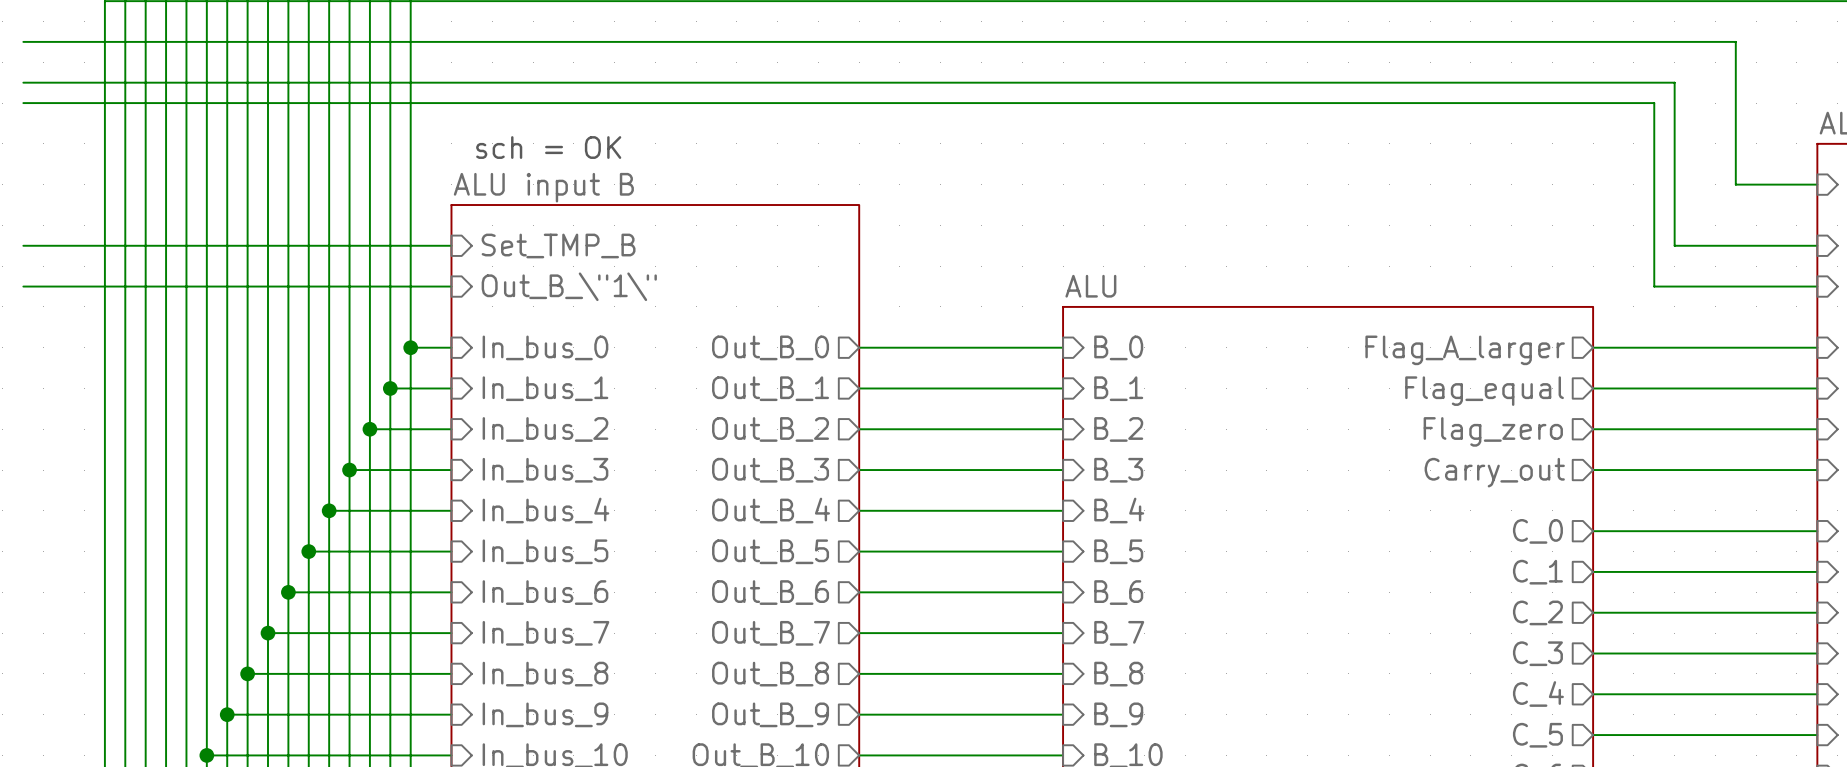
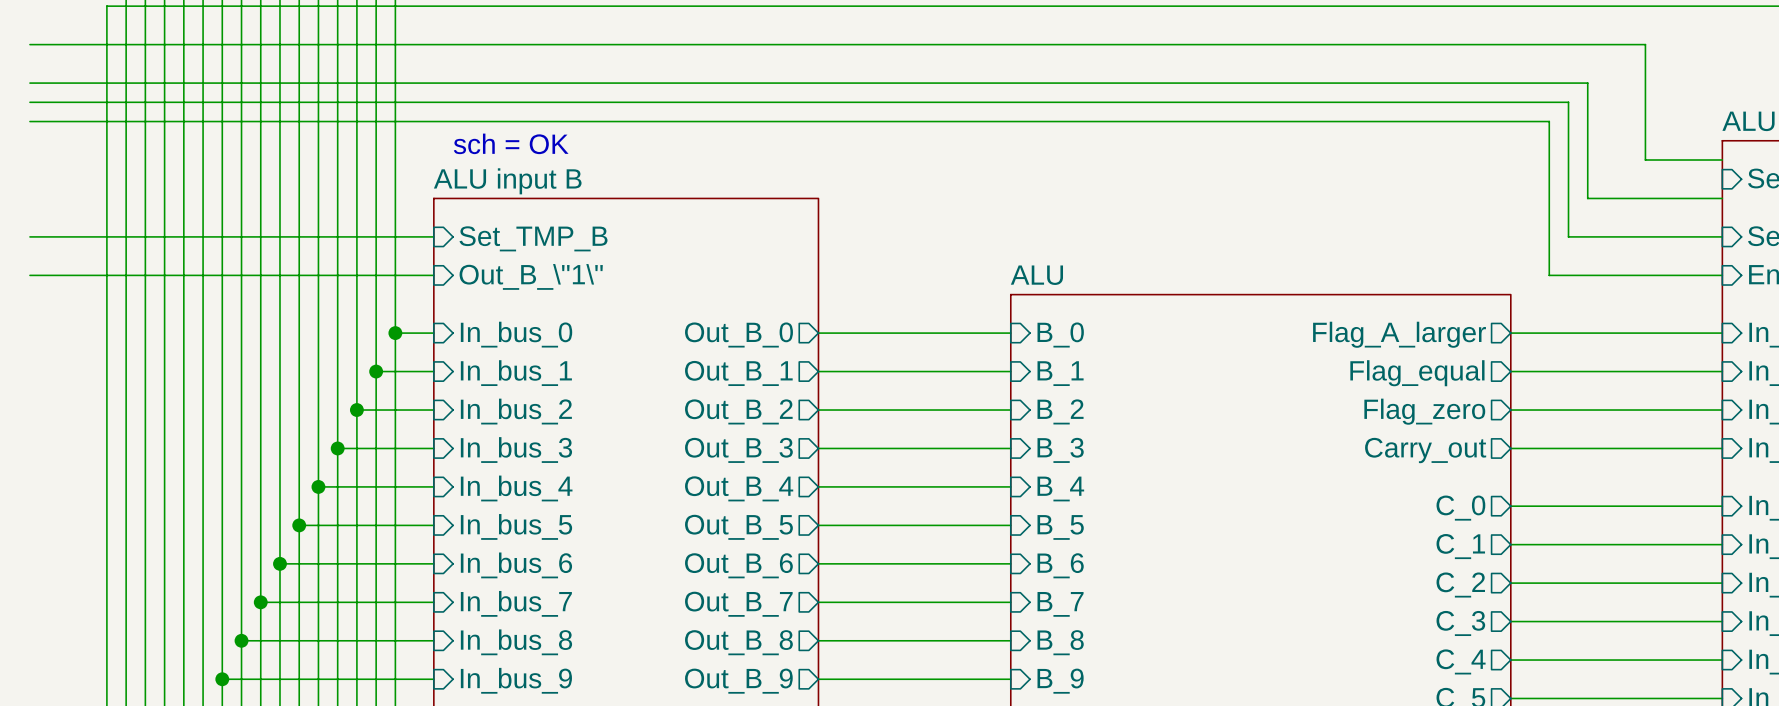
wire: none -> (29, 121) (1549, 121) (1549, 275) (1568, 275)
wire: (1735, 164) (1735, 184) (1817, 184) -> (1645, 160) (1722, 160)
wire: (1674, 205) (1674, 245) -> (1587, 198) (1722, 198)
wire: (1654, 245) (1654, 286) -> (1568, 236) (1587, 236)

